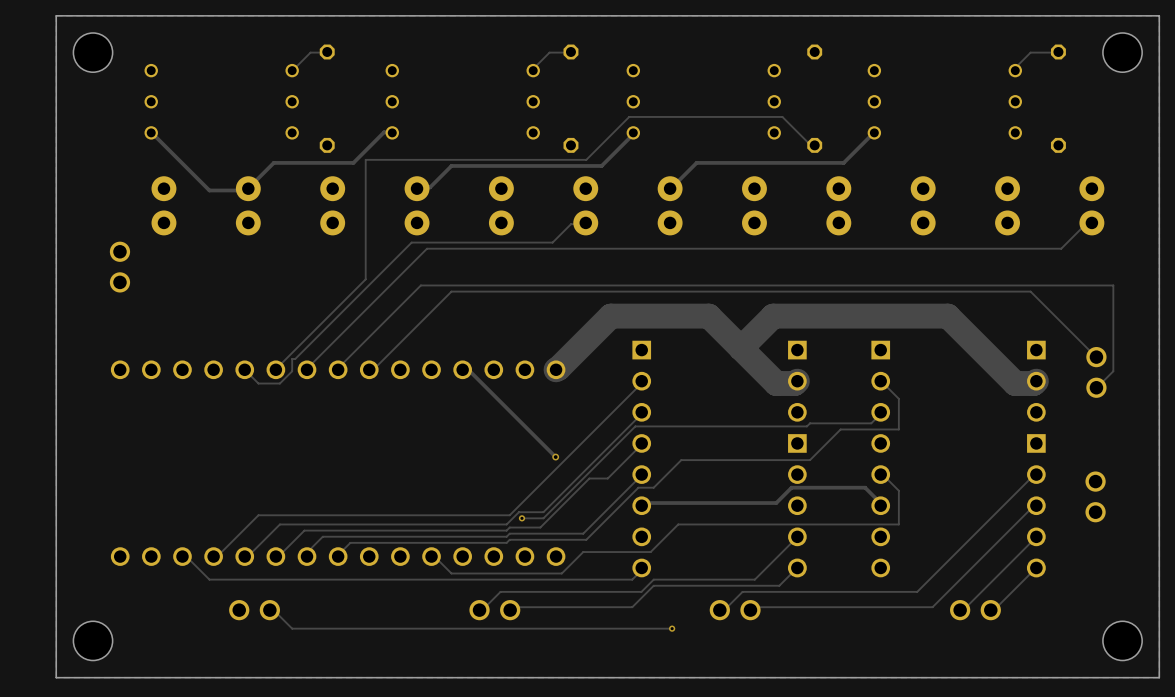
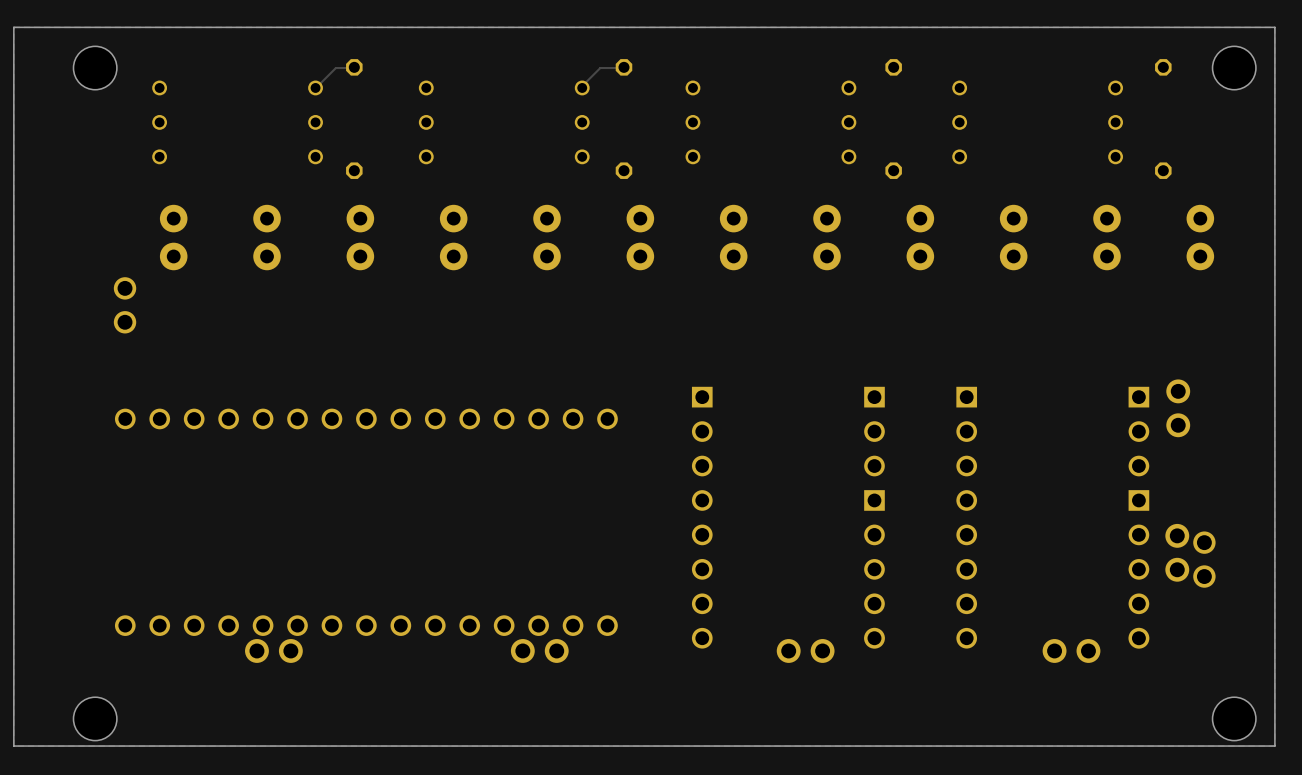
board edge: (56, 15) (56, 677) (1159, 677) (1159, 665) -> (54, 27) (13, 27) (13, 746) (1274, 746)
track: (1058, 51) (1030, 52) (1015, 67) (1015, 70) -> none
track: (392, 132) (384, 132) (353, 162) (273, 162) (246, 190) (209, 190) (151, 132) -> none
track: (633, 132) (601, 165) (451, 165) (430, 187) (417, 188) -> none
track: (874, 132) (874, 135) (871, 135) (843, 162) (696, 162) (670, 188) -> none
track: (814, 145) (810, 144) (782, 116) (629, 116) (586, 159) (365, 159) (365, 279) (275, 369) -> none
track: (585, 222) (571, 224) (552, 242) (411, 242) (295, 359) (292, 359) (292, 371) (279, 383) (258, 383) (244, 369) -> none
track: (1091, 222) (1085, 224) (1061, 248) (427, 248) (307, 369) -> none
track: (741, 348) (773, 316) (947, 316) (1015, 383) (1033, 383) (1036, 381) -> none
track: (1096, 357) (1030, 291) (451, 291) (374, 368) (369, 369) -> none
part: none -> (1178, 408)
track: (338, 369) (420, 285) (1113, 285) (1113, 371) (1096, 387) -> none
track: (462, 369) (469, 371) (555, 457) -> none
track: (556, 369) (610, 316) (708, 316) (776, 383) (794, 383) (797, 381) -> none
part: (1096, 372) -> none
track: (641, 381) (509, 515) (258, 515) (218, 555) (213, 556) -> none
track: (880, 381) (898, 398) (898, 429) (840, 429) (810, 460) (681, 460) (653, 487) (638, 487) (586, 539) (509, 539) (506, 542) (350, 542) (338, 556) -> none
track: (641, 412) (543, 512) (518, 512) (506, 524) (279, 524) (249, 555) (244, 556) -> none
track: (880, 412) (871, 423) (810, 423) (806, 426) (635, 426) (543, 518) (521, 518) -> none
track: (641, 443) (607, 478) (589, 478) (540, 527) (509, 527) (506, 530) (304, 530) (279, 555) (275, 556) -> none
via: (555, 457) -> none
track: (641, 474) (583, 533) (509, 533) (506, 536) (322, 536) (304, 555) (307, 556) -> none
track: (880, 474) (898, 490) (898, 524) (678, 524) (650, 552) (583, 552) (561, 573) (451, 573) (436, 558) (431, 556) -> none
track: (1036, 474) (917, 591) (742, 591) (727, 607) (721, 607) (719, 610) -> none
part: none -> (1177, 552)
track: (880, 505) (880, 503) (865, 487) (791, 487) (776, 503) (644, 503) (641, 505) -> none
track: (1036, 505) (1033, 506) (932, 607) (751, 607) (750, 610) -> none
via: (521, 518) -> none
track: (797, 536) (754, 579) (653, 579) (641, 591) (500, 591) (485, 607) (479, 610) -> none
track: (1036, 536) (966, 607) (960, 607) (960, 610) -> none
track: (182, 556) (188, 558) (209, 579) (632, 579) (641, 567) -> none
track: (797, 567) (779, 585) (653, 585) (632, 607) (512, 607) (510, 610) -> none
track: (1036, 567) (996, 607) (990, 607) (990, 610) -> none
part: none -> (273, 650)
part: none -> (539, 650)
part: none -> (805, 650)
part: none -> (1071, 650)
part: (254, 610) -> none
track: (269, 610) (273, 610) (292, 628) (672, 628) -> none
part: (494, 610) -> none
part: (735, 610) -> none
part: (975, 610) -> none
via: (672, 628) -> none

